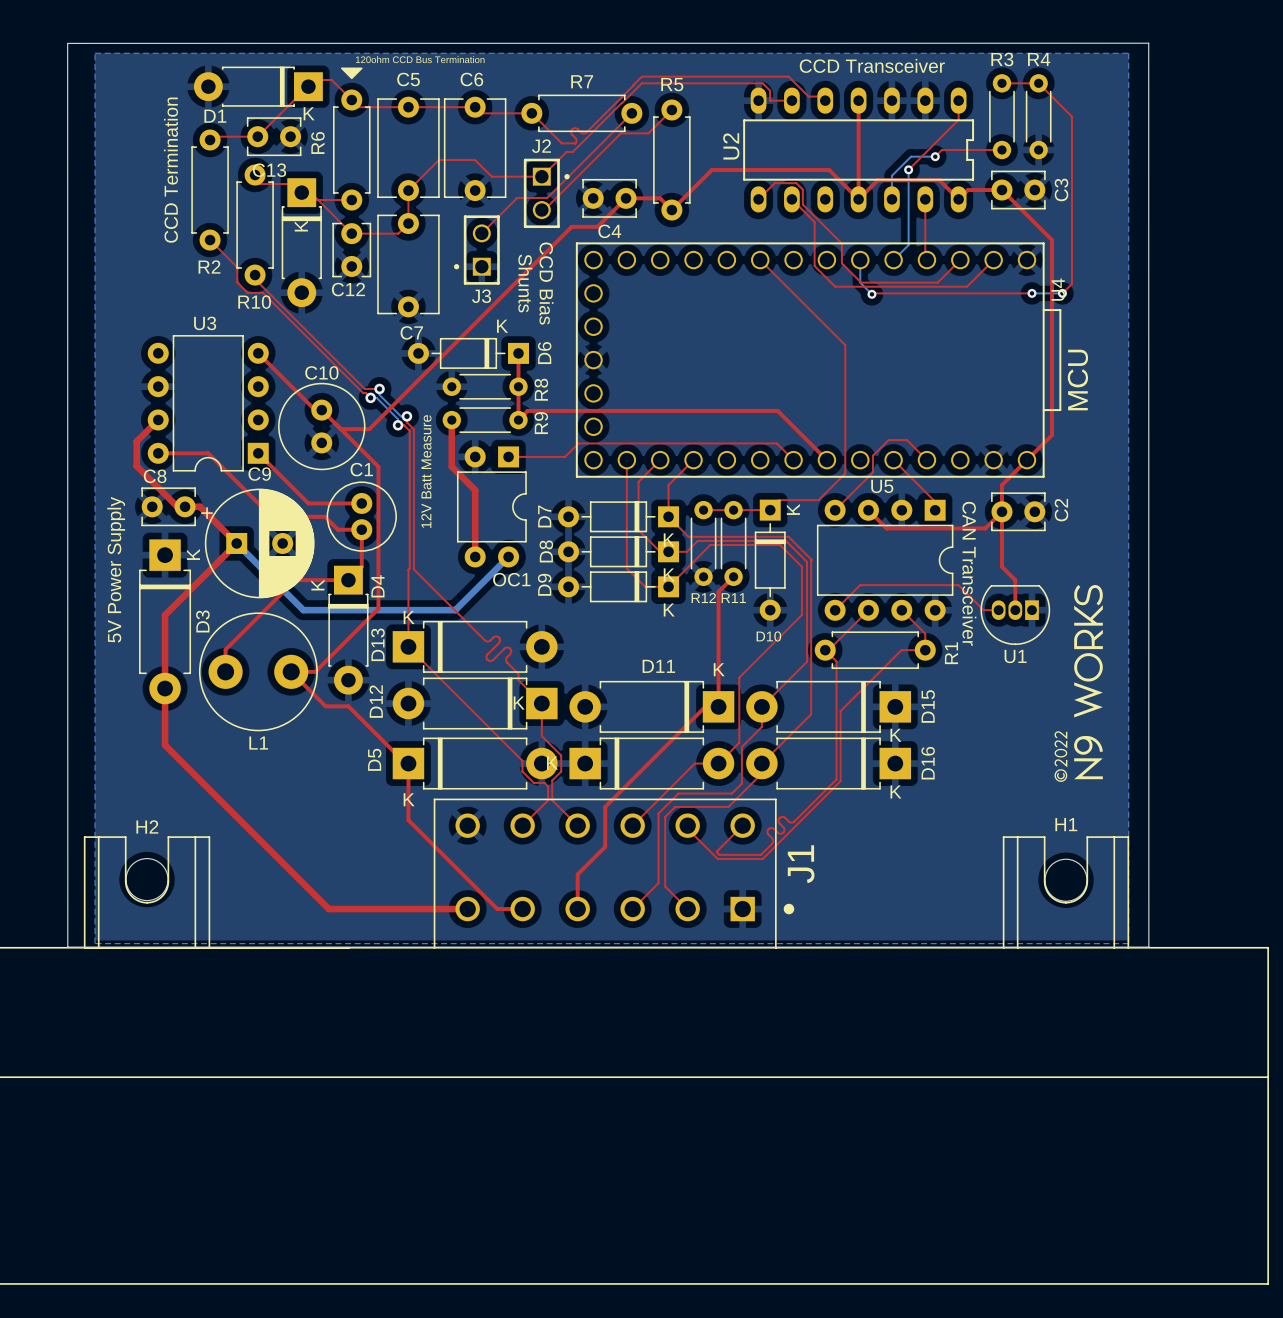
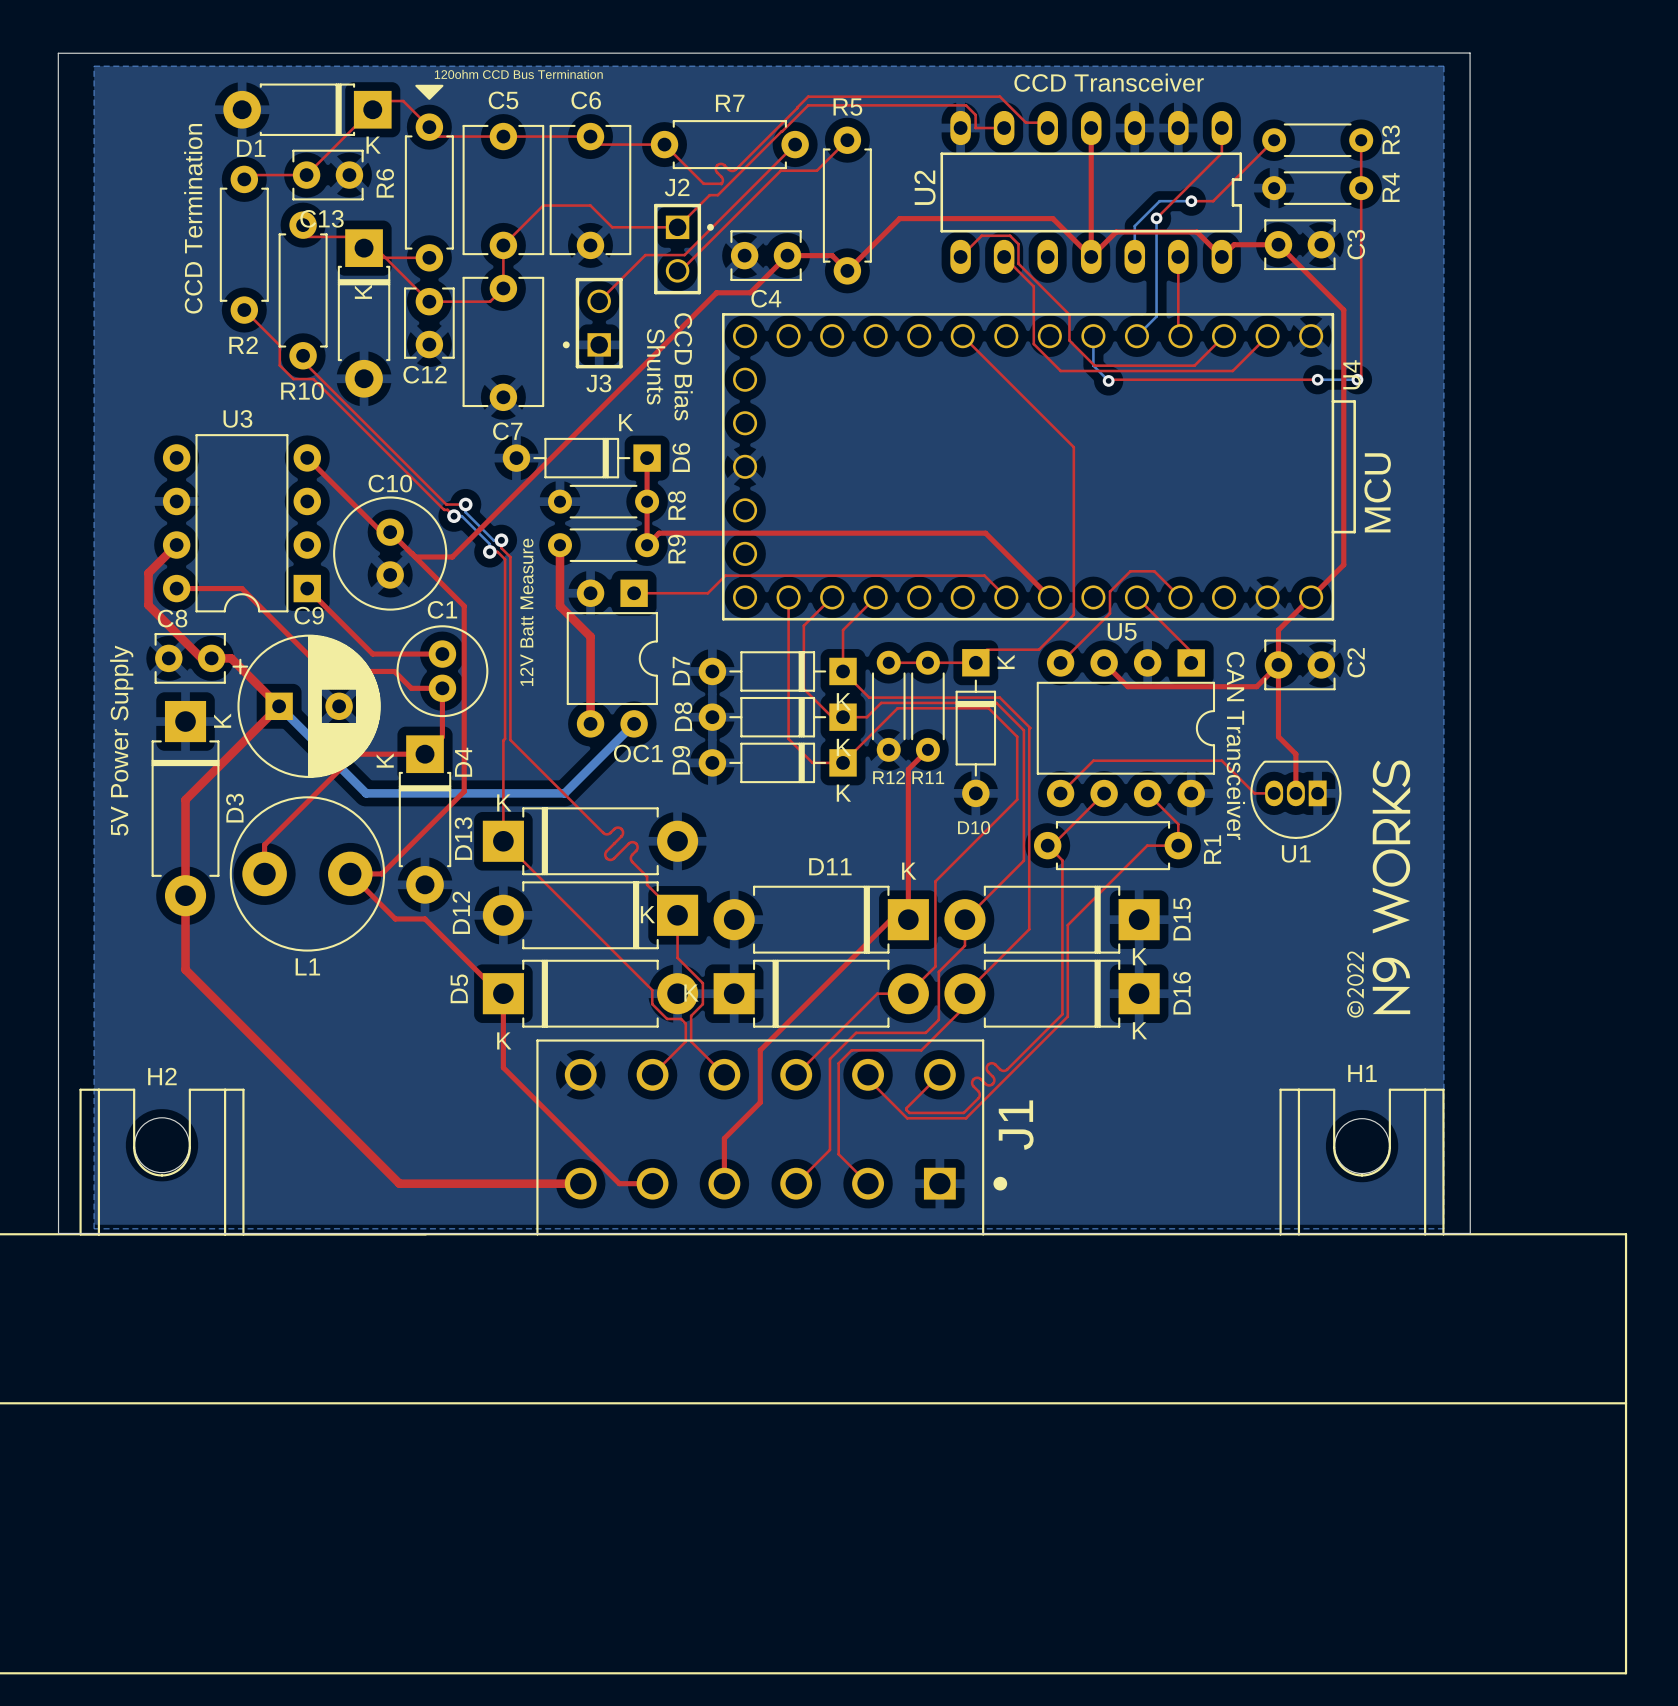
top track: (1001, 83) (1038, 83) (1072, 116) (1072, 283) (1065, 290) -> (1361, 140) (1361, 375)
R3 rotation: 0° (1001, 116) -> 90° clockwise (1317, 140)
R4 rotation: 0° (1038, 116) -> 90° clockwise (1317, 188)
top track: (1001, 150) (941, 150) (935, 156) -> (1274, 140) (1213, 201) (1191, 201)

